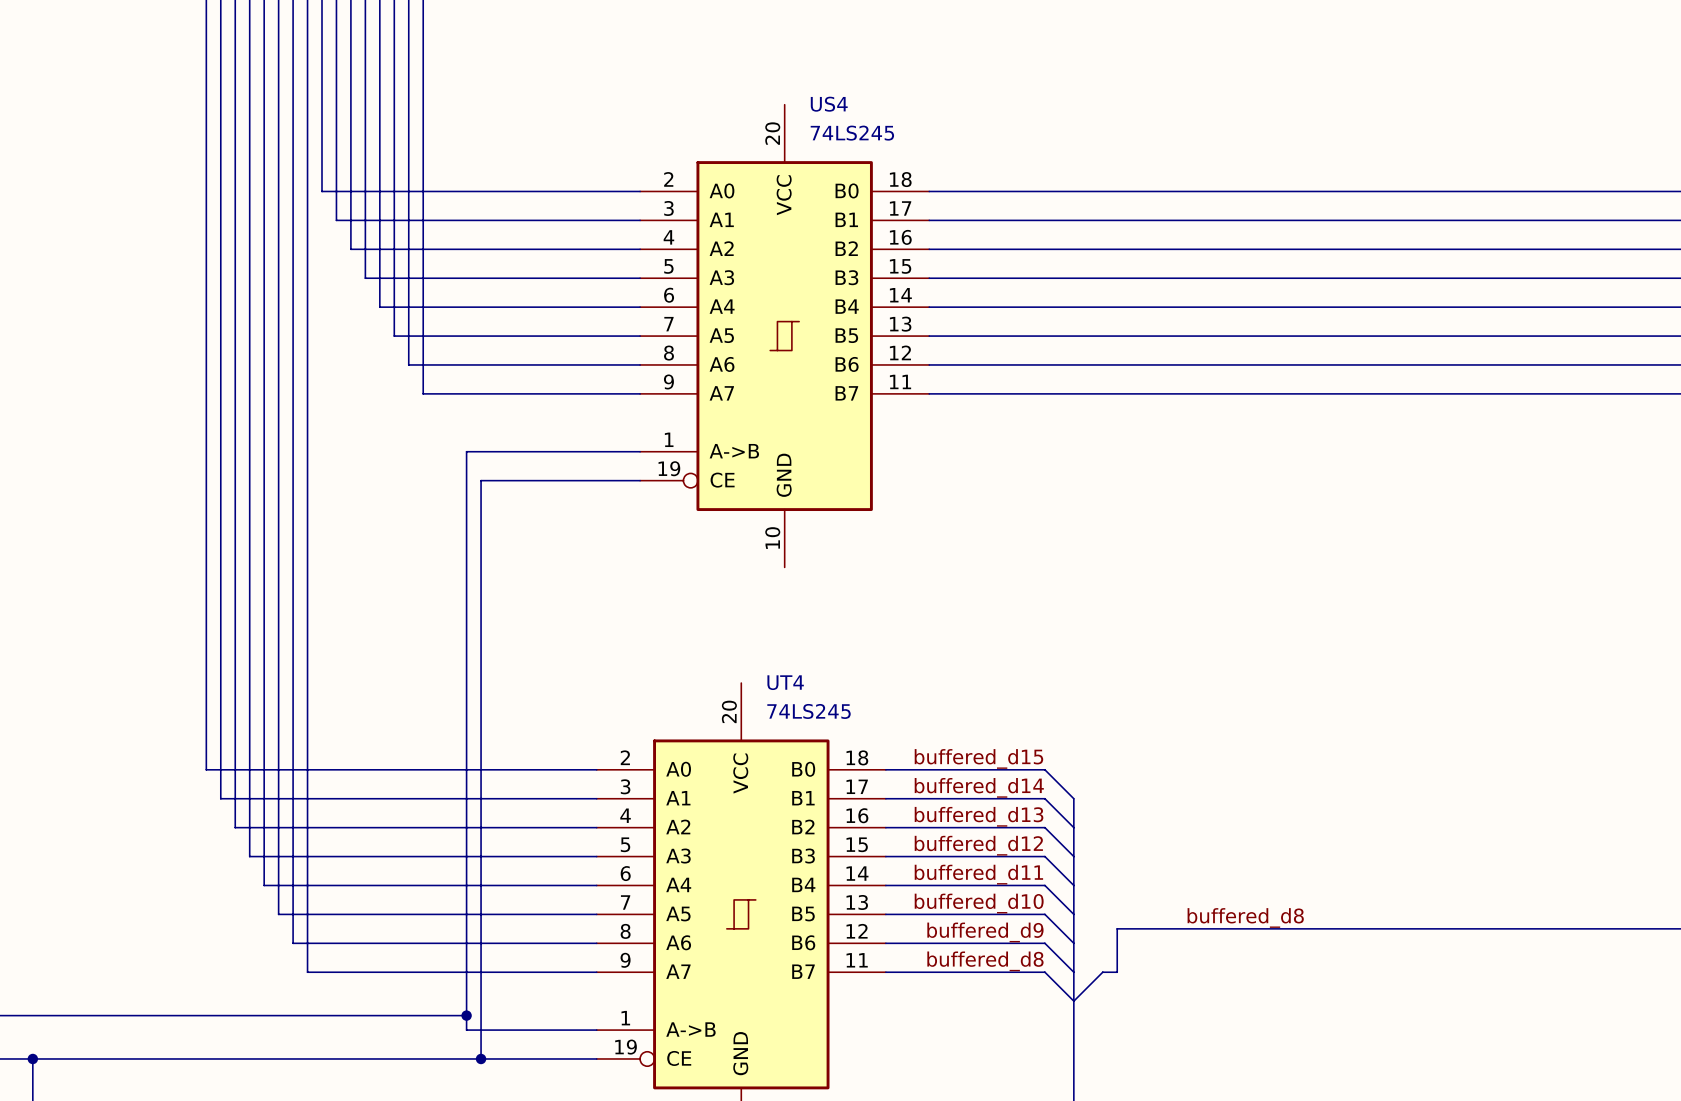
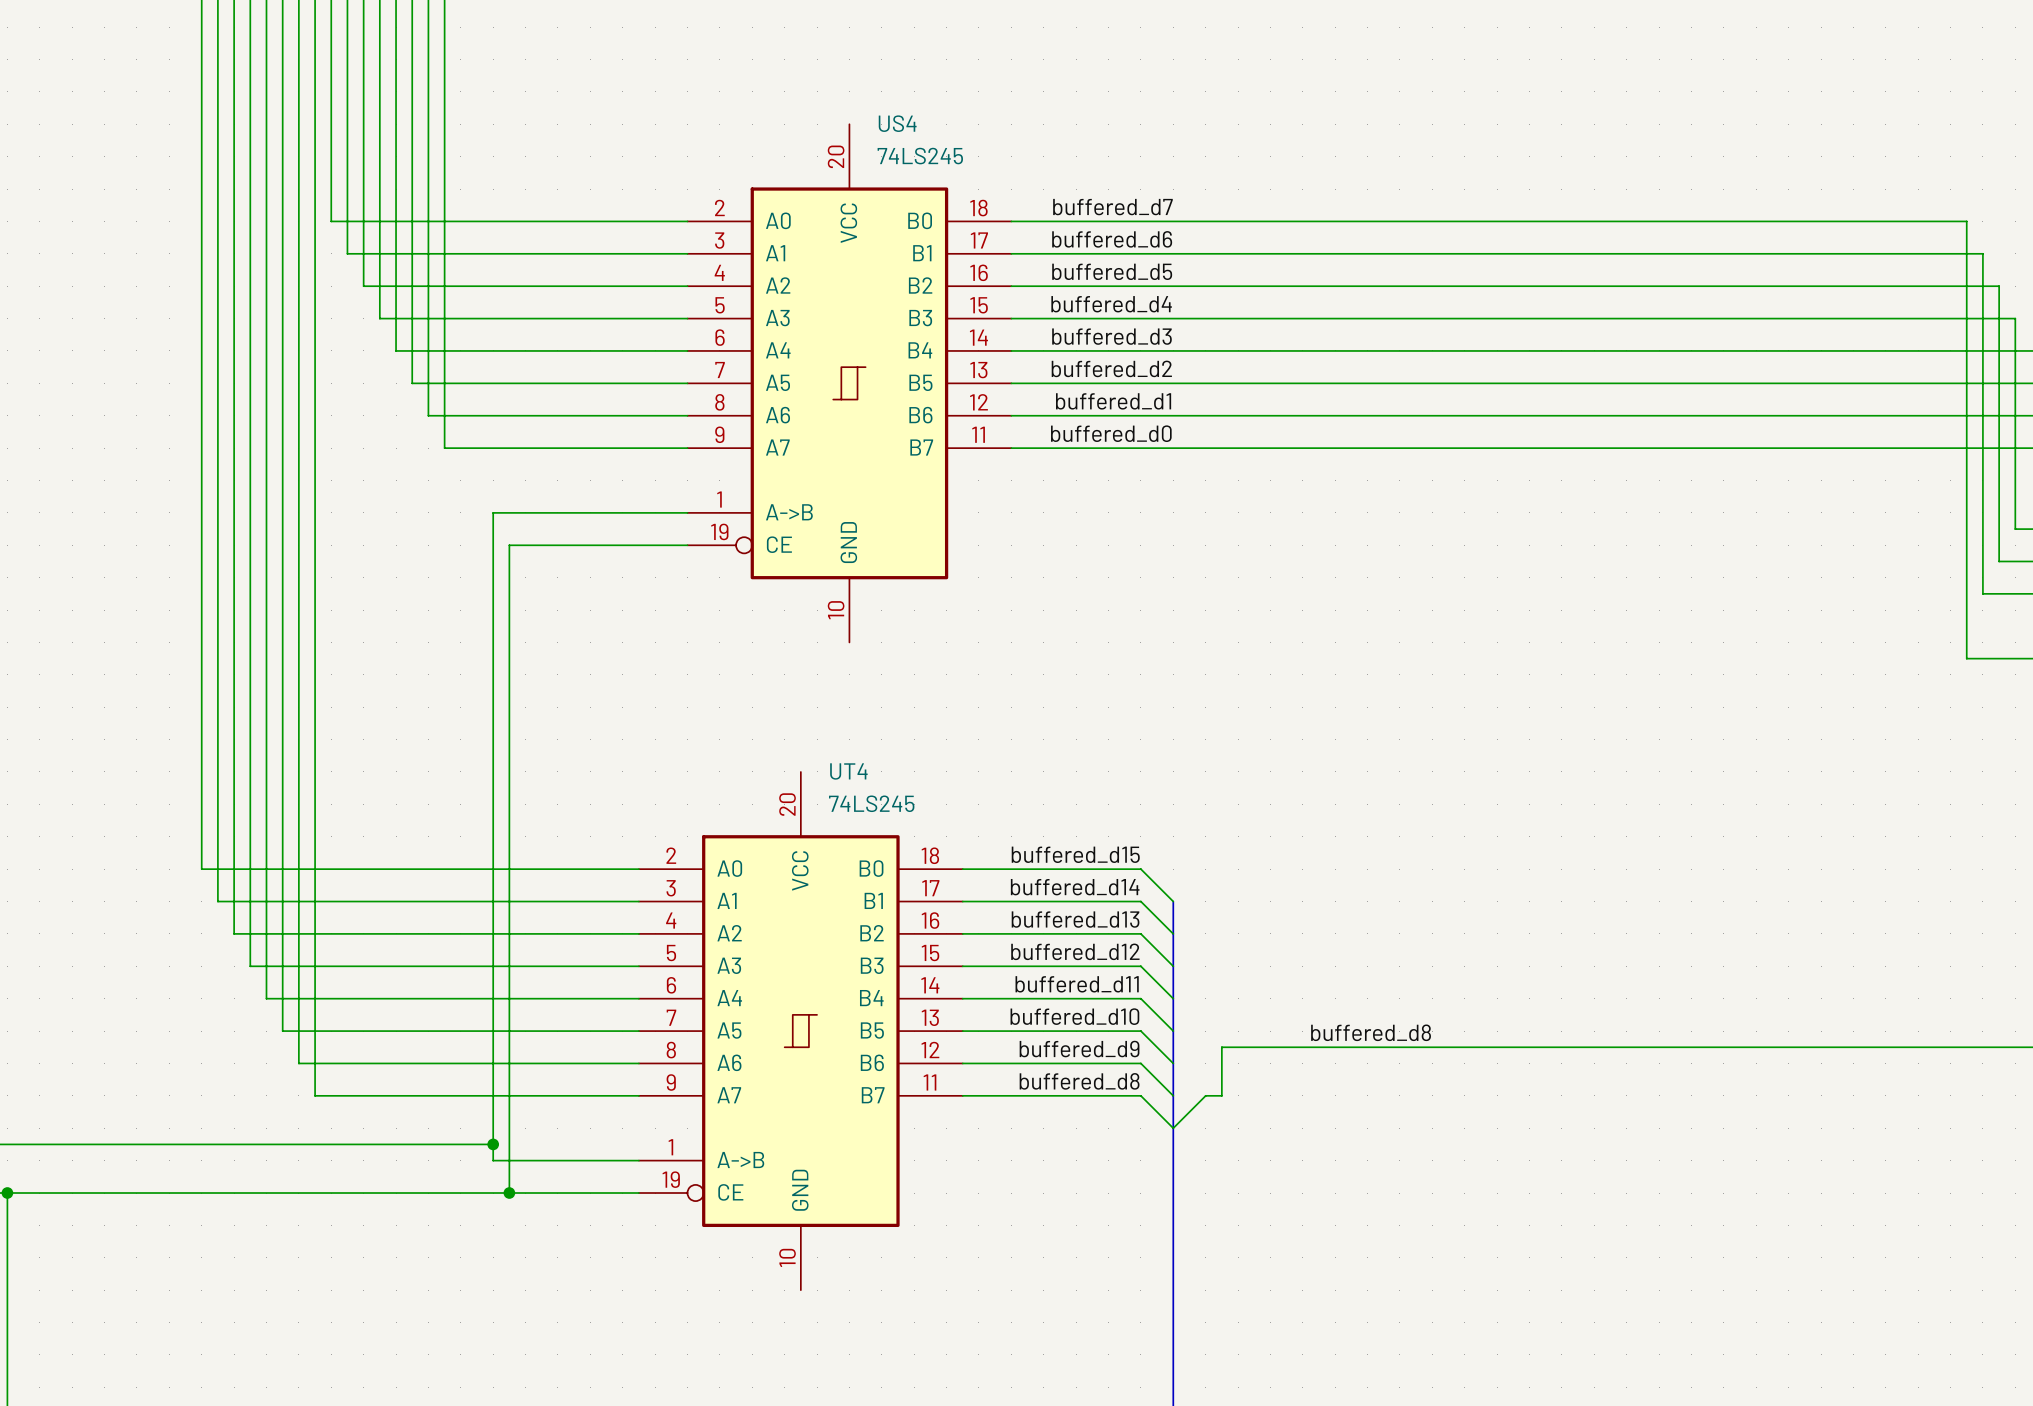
label: none -> buffered_d7 (1112, 207)
label: none -> buffered_d6 (1112, 239)
label: none -> buffered_d5 (1112, 271)
label: none -> buffered_d4 (1111, 304)
label: none -> buffered_d3 (1111, 336)
label: none -> buffered_d2 (1111, 368)
label: none -> buffered_d1 (1113, 401)
label: none -> buffered_d0 (1111, 433)

